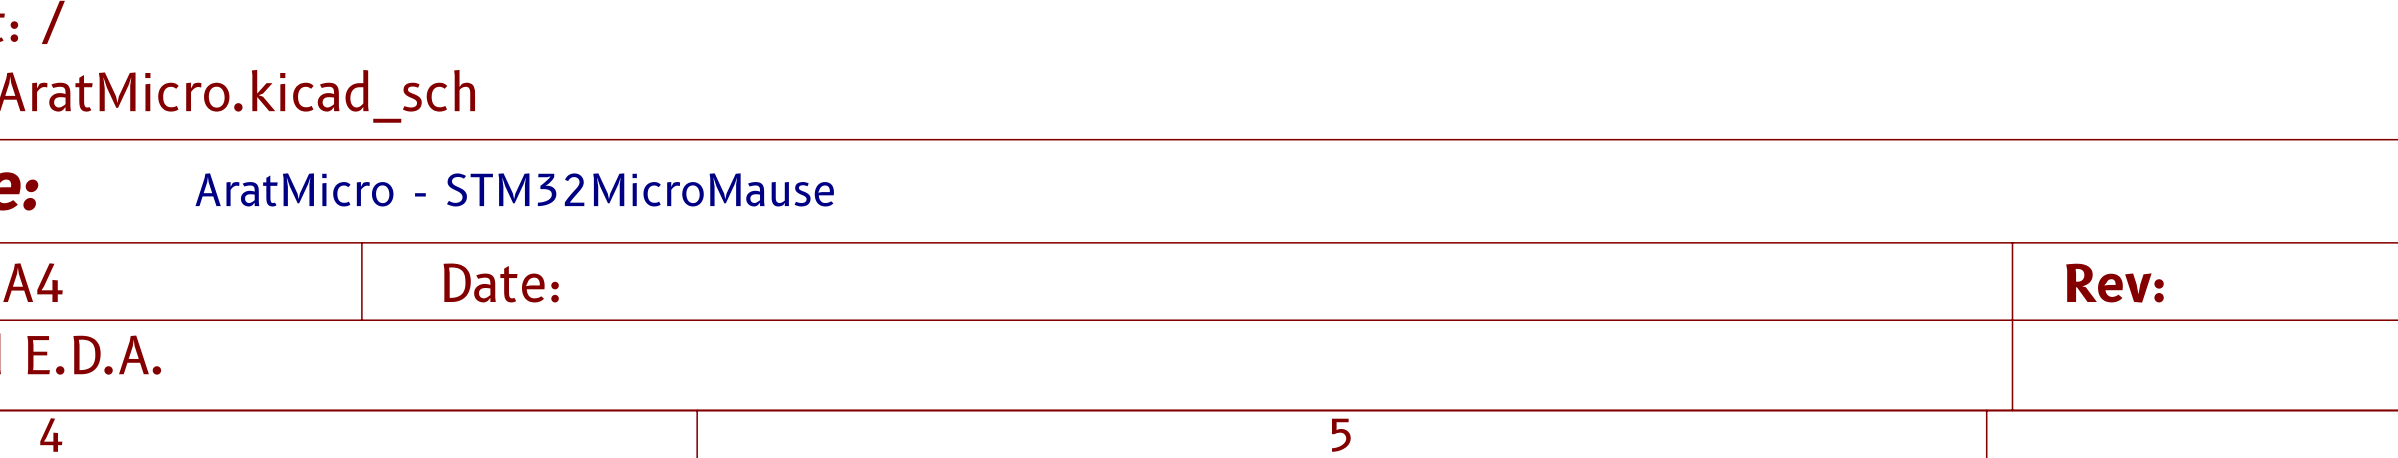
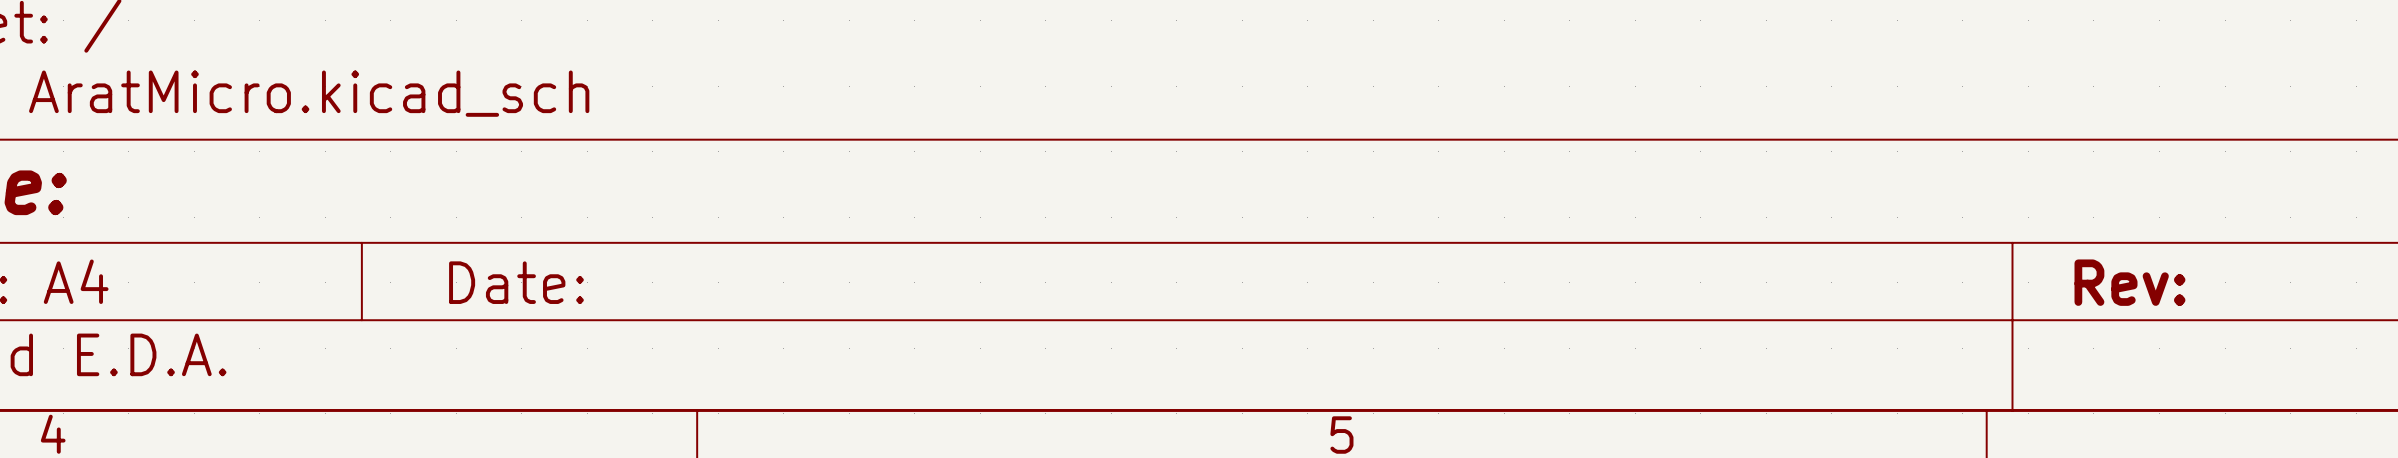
text: AratMicro - STM32MicroMause (514, 189) -> none

